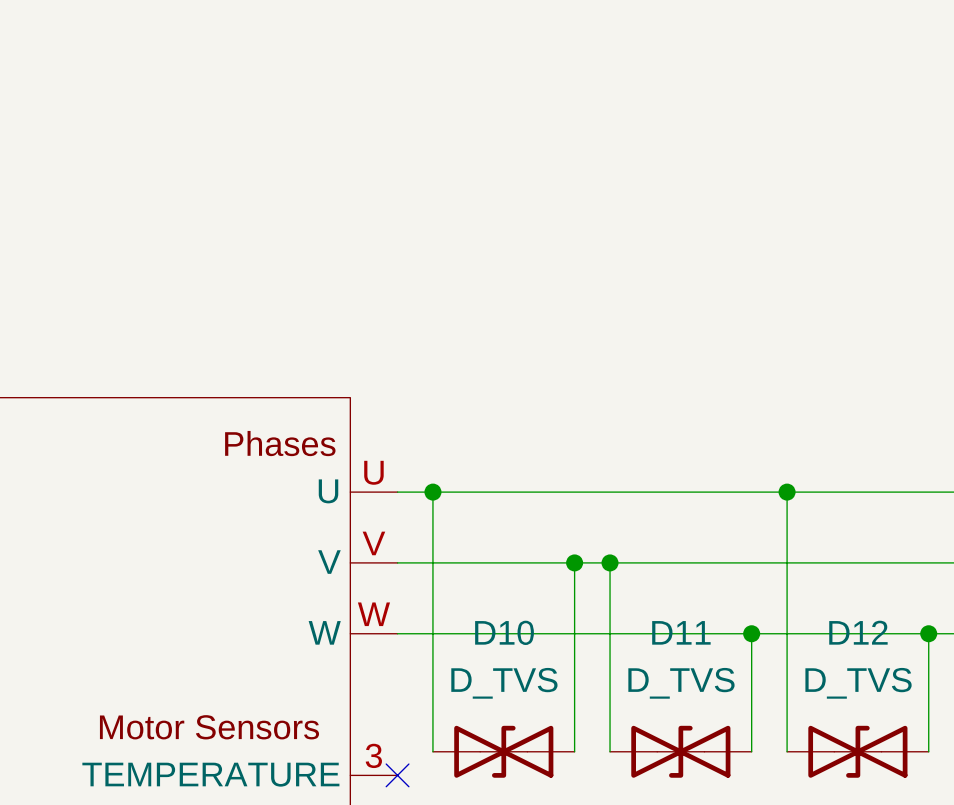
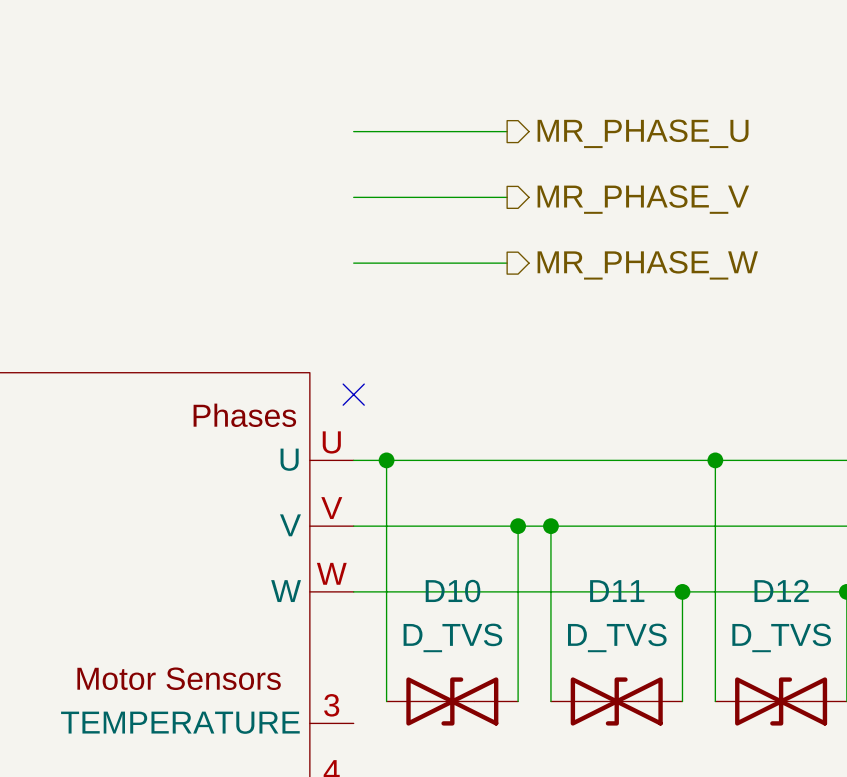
wire: none -> (353, 131) (507, 131)
hierarchical label: none -> MR_PHASE_U (643, 133)
wire: none -> (353, 197) (507, 197)
hierarchical label: none -> MR_PHASE_V (643, 199)
wire: none -> (353, 263) (507, 263)
hierarchical label: none -> MR_PHASE_W (647, 265)
no-connect mark: none -> (353, 394)
no-connect mark: (397, 775) -> none

